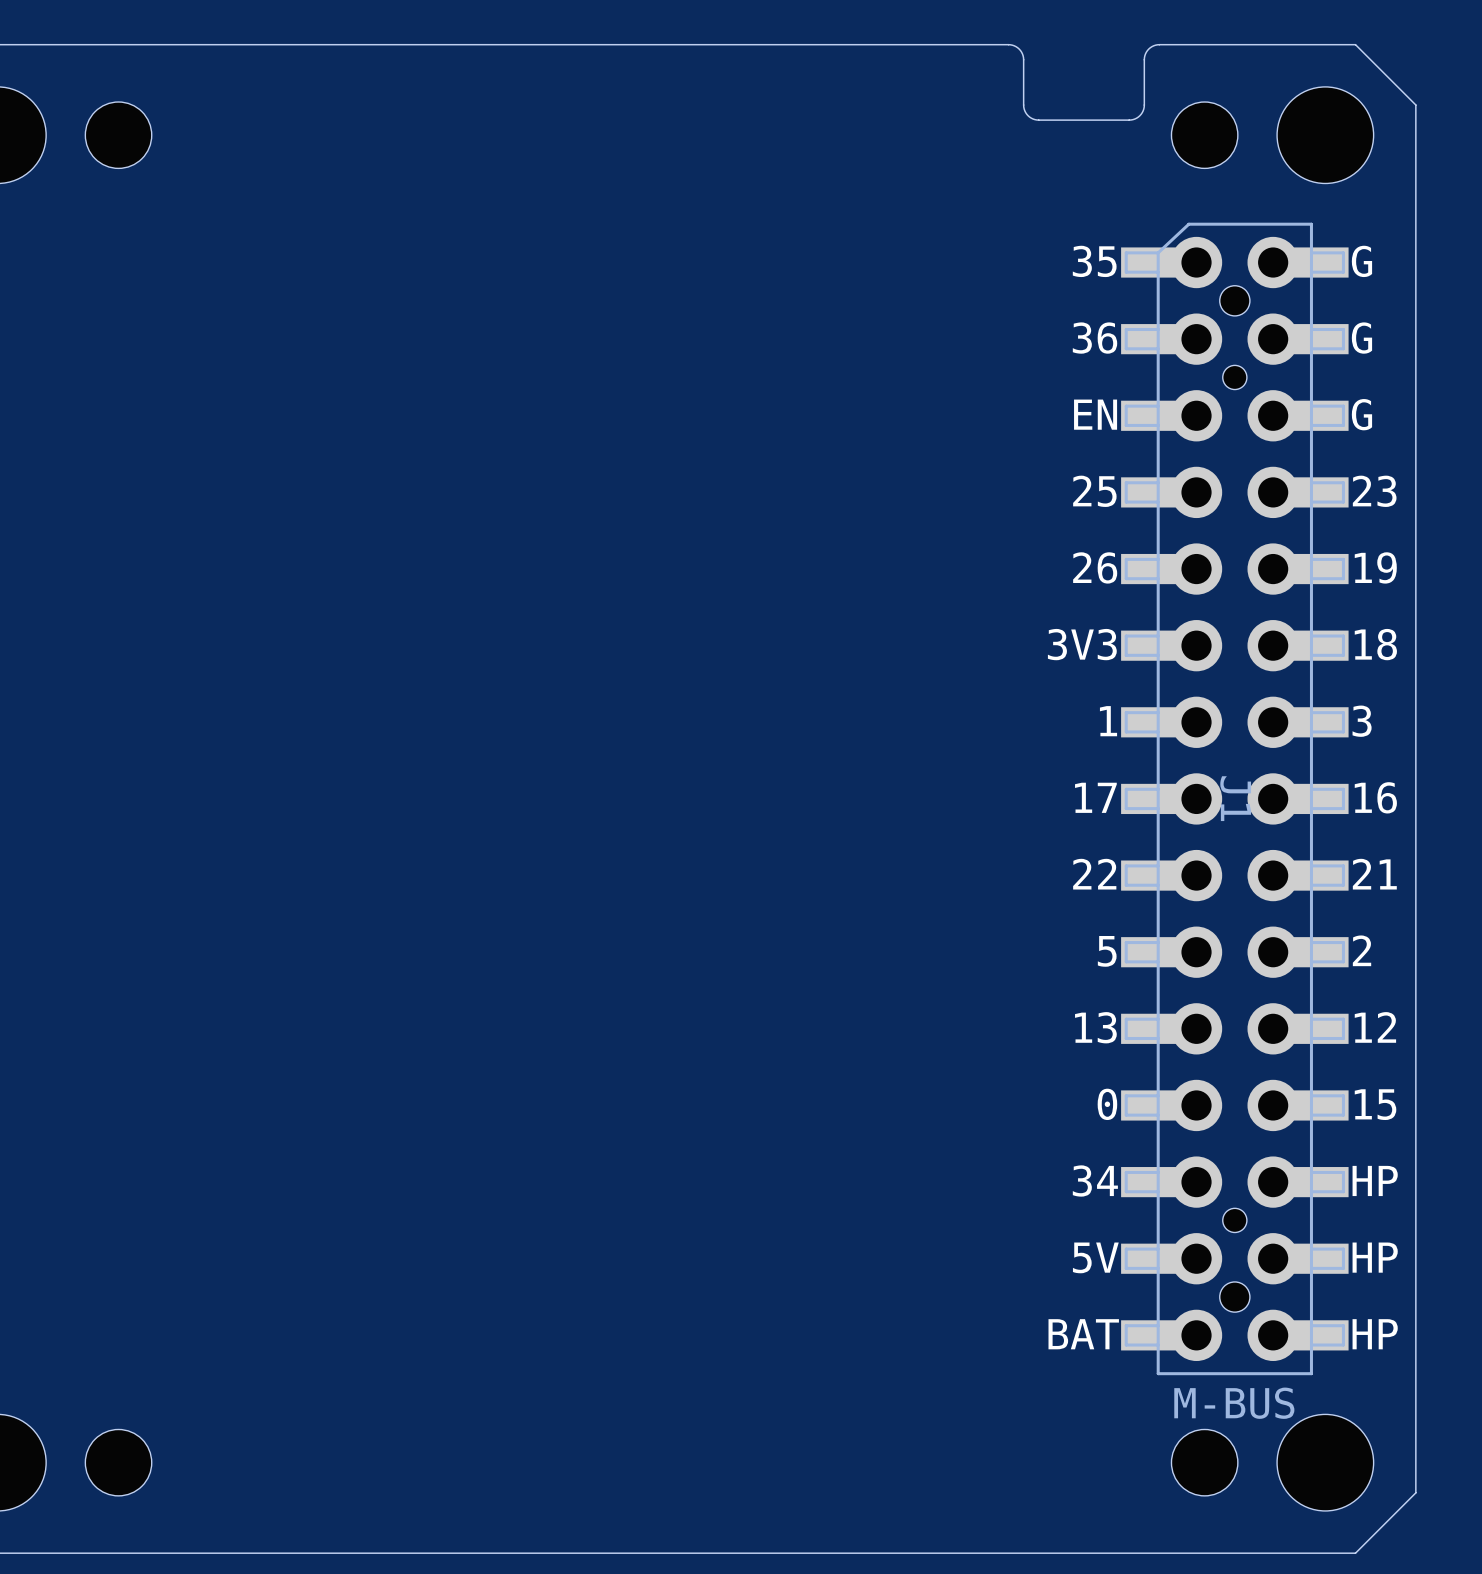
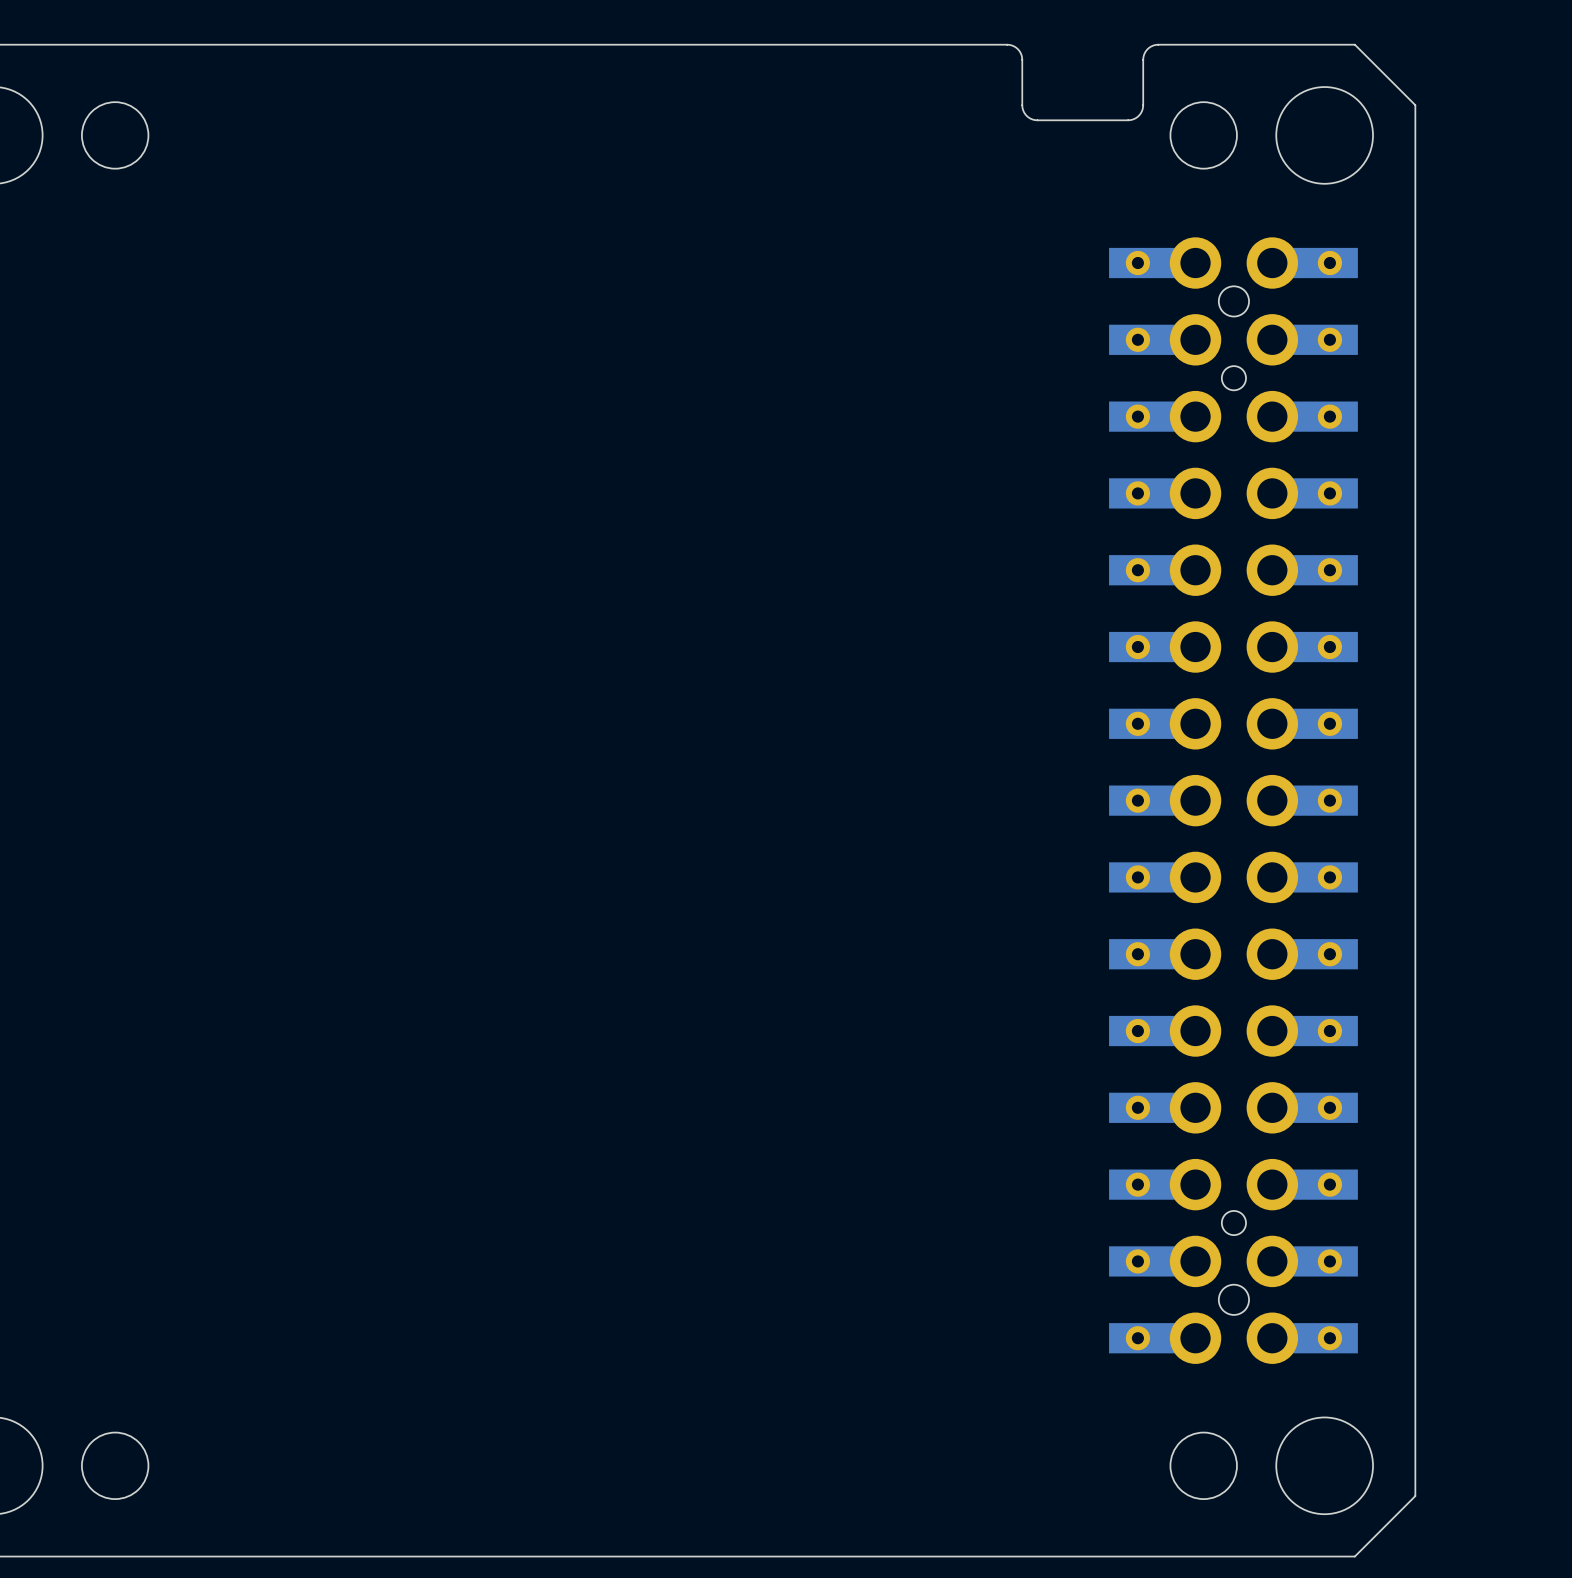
J1: (1234, 798) -> none
part: none -> (1233, 800)

